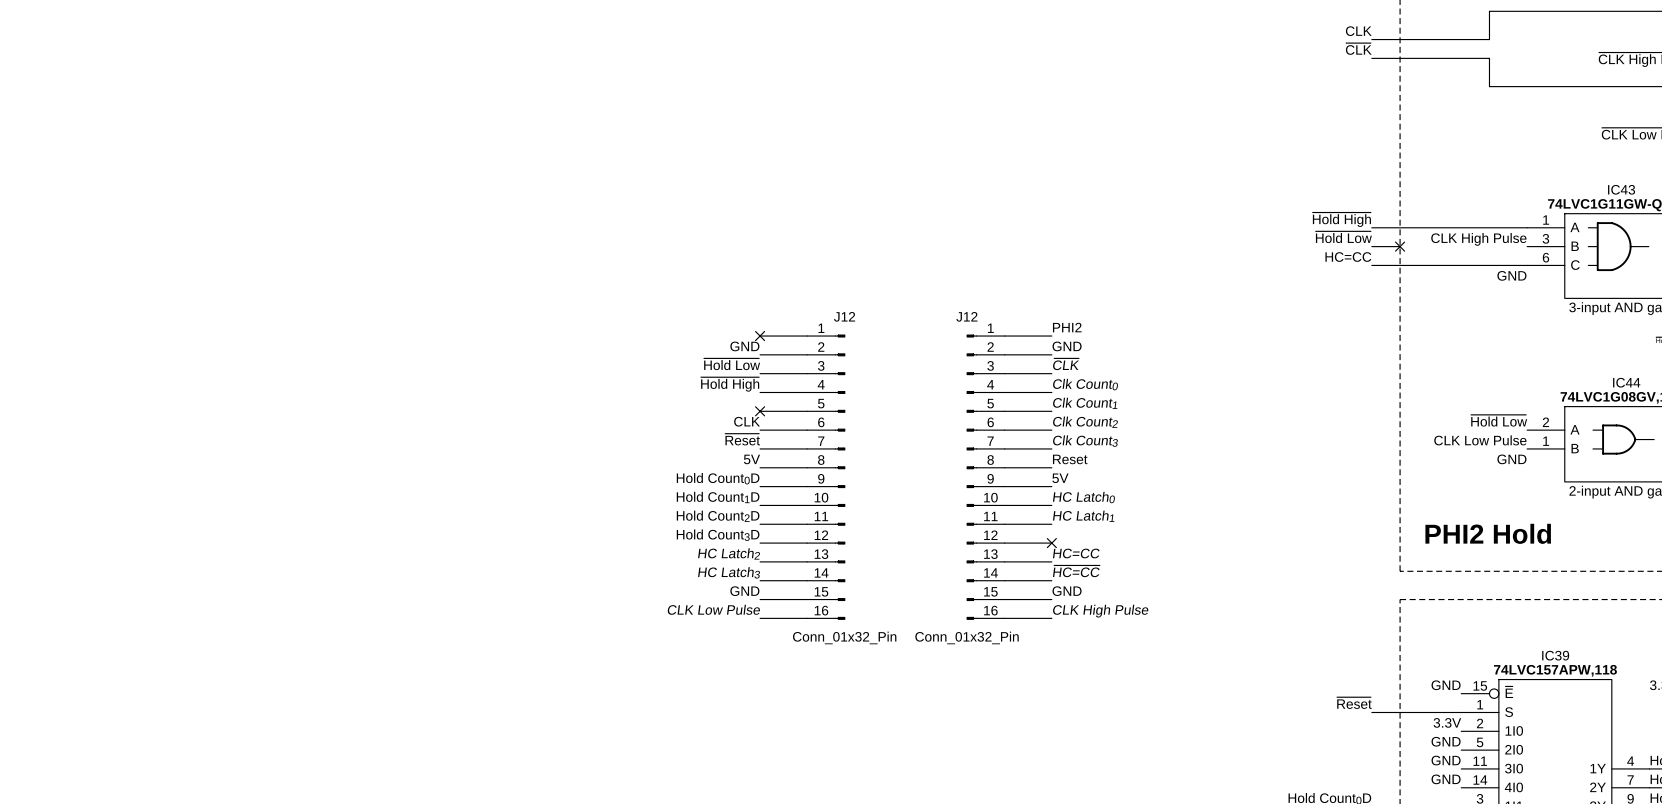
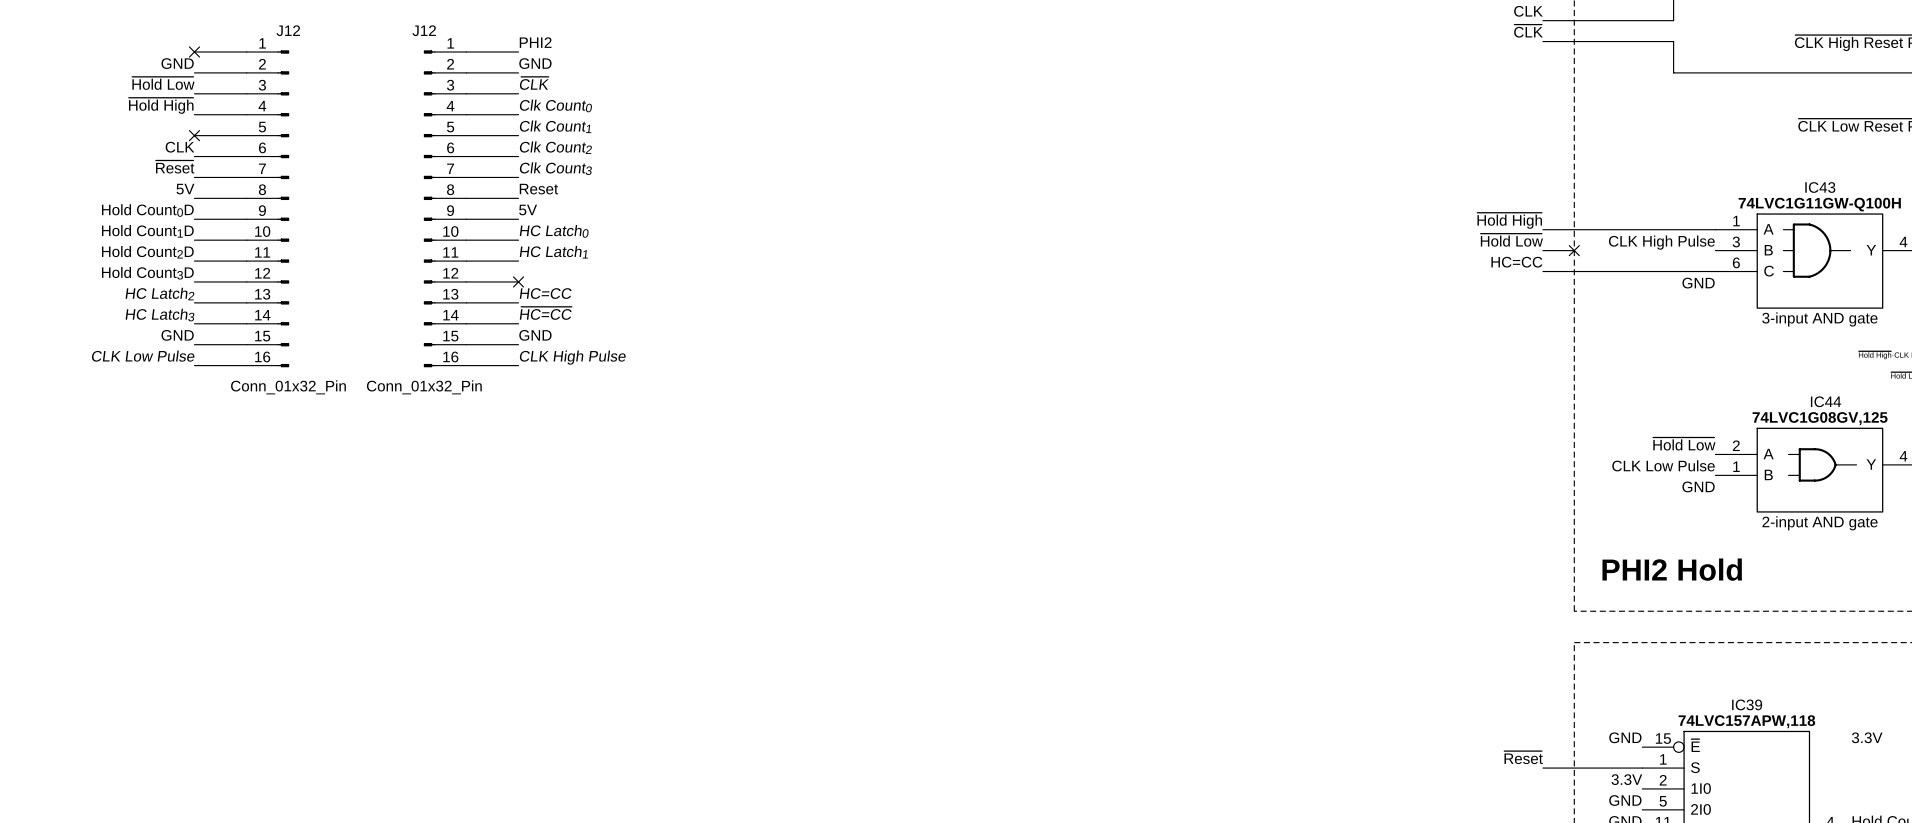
label: none -> PHI2 (535, 42)
wire: none -> (194, 52) (246, 52)
no-connect mark: none -> (194, 52)
wire: none -> (466, 52) (518, 52)
label: none -> GND (177, 63)
label: none -> GND (535, 63)
wire: none -> (194, 72) (246, 72)
wire: none -> (466, 72) (518, 72)
label: none -> ~{Hold Low} (163, 83)
label: none -> ~{CLK} (534, 83)
wire: none -> (194, 93) (246, 93)
wire: none -> (466, 93) (518, 93)
label: none -> ~{Hold High} (161, 105)
label: none -> Clk Count0 (555, 105)
wire: none -> (194, 114) (246, 114)
wire: none -> (466, 114) (518, 114)
label: none -> Clk Count1 (555, 126)
wire: none -> (194, 135) (246, 135)
no-connect mark: none -> (194, 135)
wire: none -> (466, 135) (518, 135)
label: none -> CLK (180, 147)
label: none -> Clk Count2 (555, 147)
wire: none -> (194, 156) (246, 156)
wire: none -> (466, 156) (518, 156)
label: none -> ~{Reset} (175, 166)
label: none -> Clk Count3 (555, 168)
wire: none -> (194, 177) (246, 177)
wire: none -> (466, 177) (518, 177)
label: none -> 5V (185, 189)
label: none -> Reset (538, 189)
wire: none -> (194, 198) (246, 198)
wire: none -> (466, 198) (518, 198)
J12: none -> Conn_01x32_Pin (267, 208)
J12: none -> Conn_01x32_Pin (445, 208)
label: none -> Hold Count0D (147, 210)
label: none -> 5V (528, 210)
wire: none -> (194, 219) (246, 219)
wire: none -> (466, 219) (518, 219)
label: none -> Hold Count1D (147, 231)
label: none -> HC Latch0 (554, 231)
wire: none -> (194, 240) (246, 240)
wire: none -> (466, 240) (518, 240)
label: none -> Hold Count2D (147, 252)
label: none -> HC Latch1 (553, 252)
wire: none -> (194, 261) (246, 261)
wire: none -> (466, 261) (518, 261)
label: none -> Hold Count3D (147, 273)
wire: none -> (194, 281) (246, 281)
wire: none -> (466, 281) (518, 281)
no-connect mark: none -> (518, 281)
label: none -> HC Latch2 (160, 294)
label: none -> HC=CC (545, 293)
wire: none -> (194, 302) (246, 302)
wire: none -> (466, 302) (518, 302)
label: none -> ~{HC=CC} (545, 313)
label: none -> HC Latch3 (160, 315)
wire: none -> (194, 323) (246, 323)
wire: none -> (466, 323) (518, 323)
label: none -> GND (177, 335)
label: none -> GND (535, 335)
label: PHI2 (1067, 327) -> none
wire: none -> (194, 344) (246, 344)
wire: none -> (466, 344) (518, 344)
wire: (760, 336) (807, 336) -> none
no-connect mark: (760, 336) -> none
wire: (1004, 336) (1051, 336) -> none
label: none -> CLK Low Pulse (143, 356)
label: none -> CLK High Pulse (572, 357)
label: GND (744, 346) -> none
label: GND (1067, 346) -> none
wire: none -> (194, 365) (246, 365)
wire: none -> (466, 365) (518, 365)
wire: (760, 354) (807, 354) -> none
wire: (1004, 354) (1051, 354) -> none
label: ~{Hold Low} (732, 364) -> none
label: ~{CLK} (1065, 364) -> none
wire: (760, 373) (807, 373) -> none
wire: (1004, 373) (1051, 373) -> none
label: ~{Hold High} (730, 384) -> none
label: Clk Count0 (1085, 384) -> none
wire: (760, 392) (807, 392) -> none
wire: (1004, 392) (1051, 392) -> none
label: Clk Count1 (1085, 403) -> none
wire: (760, 411) (807, 411) -> none
no-connect mark: (760, 411) -> none
wire: (1004, 411) (1051, 411) -> none
label: CLK (747, 421) -> none
label: Clk Count2 (1085, 422) -> none
wire: (760, 430) (807, 430) -> none
wire: (1004, 430) (1051, 430) -> none
label: ~{Reset} (742, 439) -> none
label: Clk Count3 (1085, 441) -> none
wire: (760, 448) (807, 448) -> none
wire: (1004, 448) (1051, 448) -> none
label: 5V (751, 459) -> none
label: Reset (1070, 459) -> none
wire: (760, 467) (807, 467) -> none
wire: (1004, 467) (1051, 467) -> none
J12: Conn_01x32_Pin (826, 477) -> none
J12: Conn_01x32_Pin (985, 477) -> none
label: Hold Count0D (718, 478) -> none
label: 5V (1060, 478) -> none
wire: (760, 486) (807, 486) -> none
wire: (1004, 486) (1051, 486) -> none
label: Hold Count1D (718, 497) -> none
label: HC Latch0 (1084, 497) -> none
wire: (760, 505) (807, 505) -> none
wire: (1004, 505) (1051, 505) -> none
label: Hold Count2D (718, 516) -> none
label: HC Latch1 (1083, 516) -> none
wire: (760, 524) (807, 524) -> none
wire: (1004, 524) (1051, 524) -> none
label: Hold Count3D (718, 535) -> none
wire: (760, 543) (807, 543) -> none
wire: (1004, 543) (1051, 543) -> none
no-connect mark: (1051, 543) -> none
label: HC Latch2 (729, 553) -> none
label: HC=CC (1076, 553) -> none
wire: (760, 561) (807, 561) -> none
wire: (1004, 561) (1051, 561) -> none
label: ~{HC=CC} (1076, 571) -> none
label: HC Latch3 (729, 572) -> none
wire: (760, 580) (807, 580) -> none
wire: (1004, 580) (1051, 580) -> none
label: GND (744, 591) -> none
label: GND (1067, 591) -> none
wire: (760, 599) (807, 599) -> none
wire: (1004, 599) (1051, 599) -> none
label: CLK Low Pulse (714, 609) -> none
label: CLK High Pulse (1100, 611) -> none
wire: (760, 618) (807, 618) -> none
wire: (1004, 618) (1051, 618) -> none

